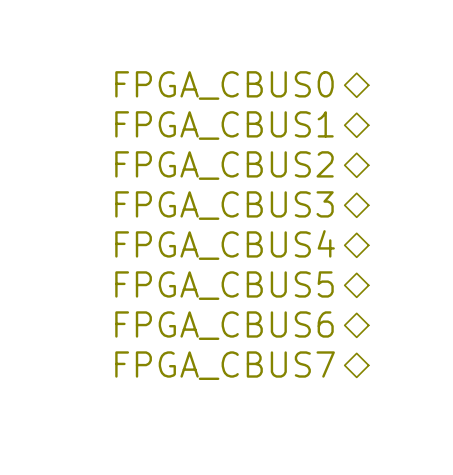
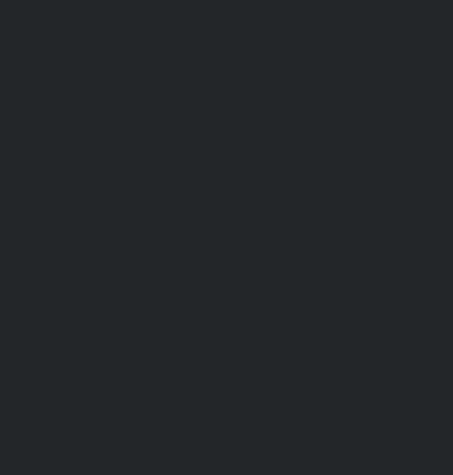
hierarchical label: FPGA_CBUS0 (224, 85) -> none
hierarchical label: FPGA_CBUS1 (224, 125) -> none
hierarchical label: FPGA_CBUS2 (224, 165) -> none
hierarchical label: FPGA_CBUS3 (224, 205) -> none
hierarchical label: FPGA_CBUS4 (225, 245) -> none
hierarchical label: FPGA_CBUS5 (224, 285) -> none
hierarchical label: FPGA_CBUS6 (224, 325) -> none
hierarchical label: FPGA_CBUS7 (225, 365) -> none

